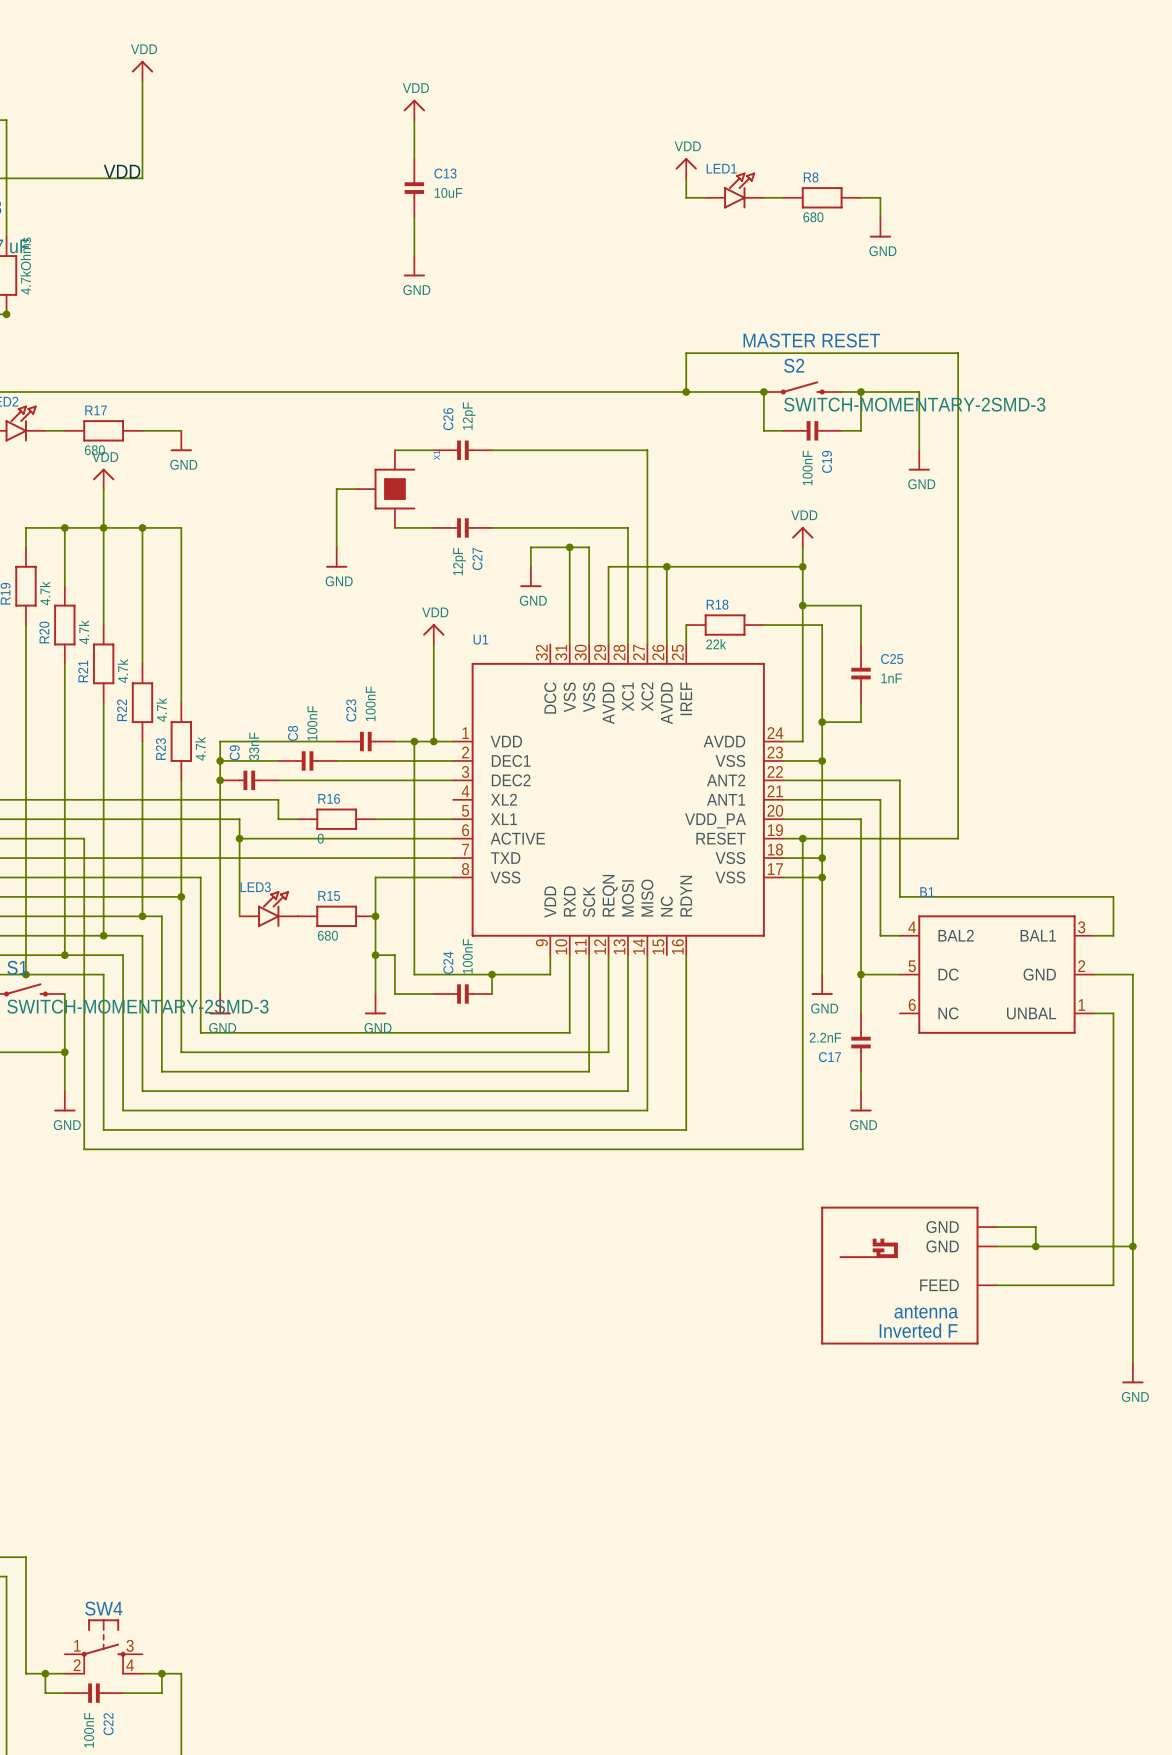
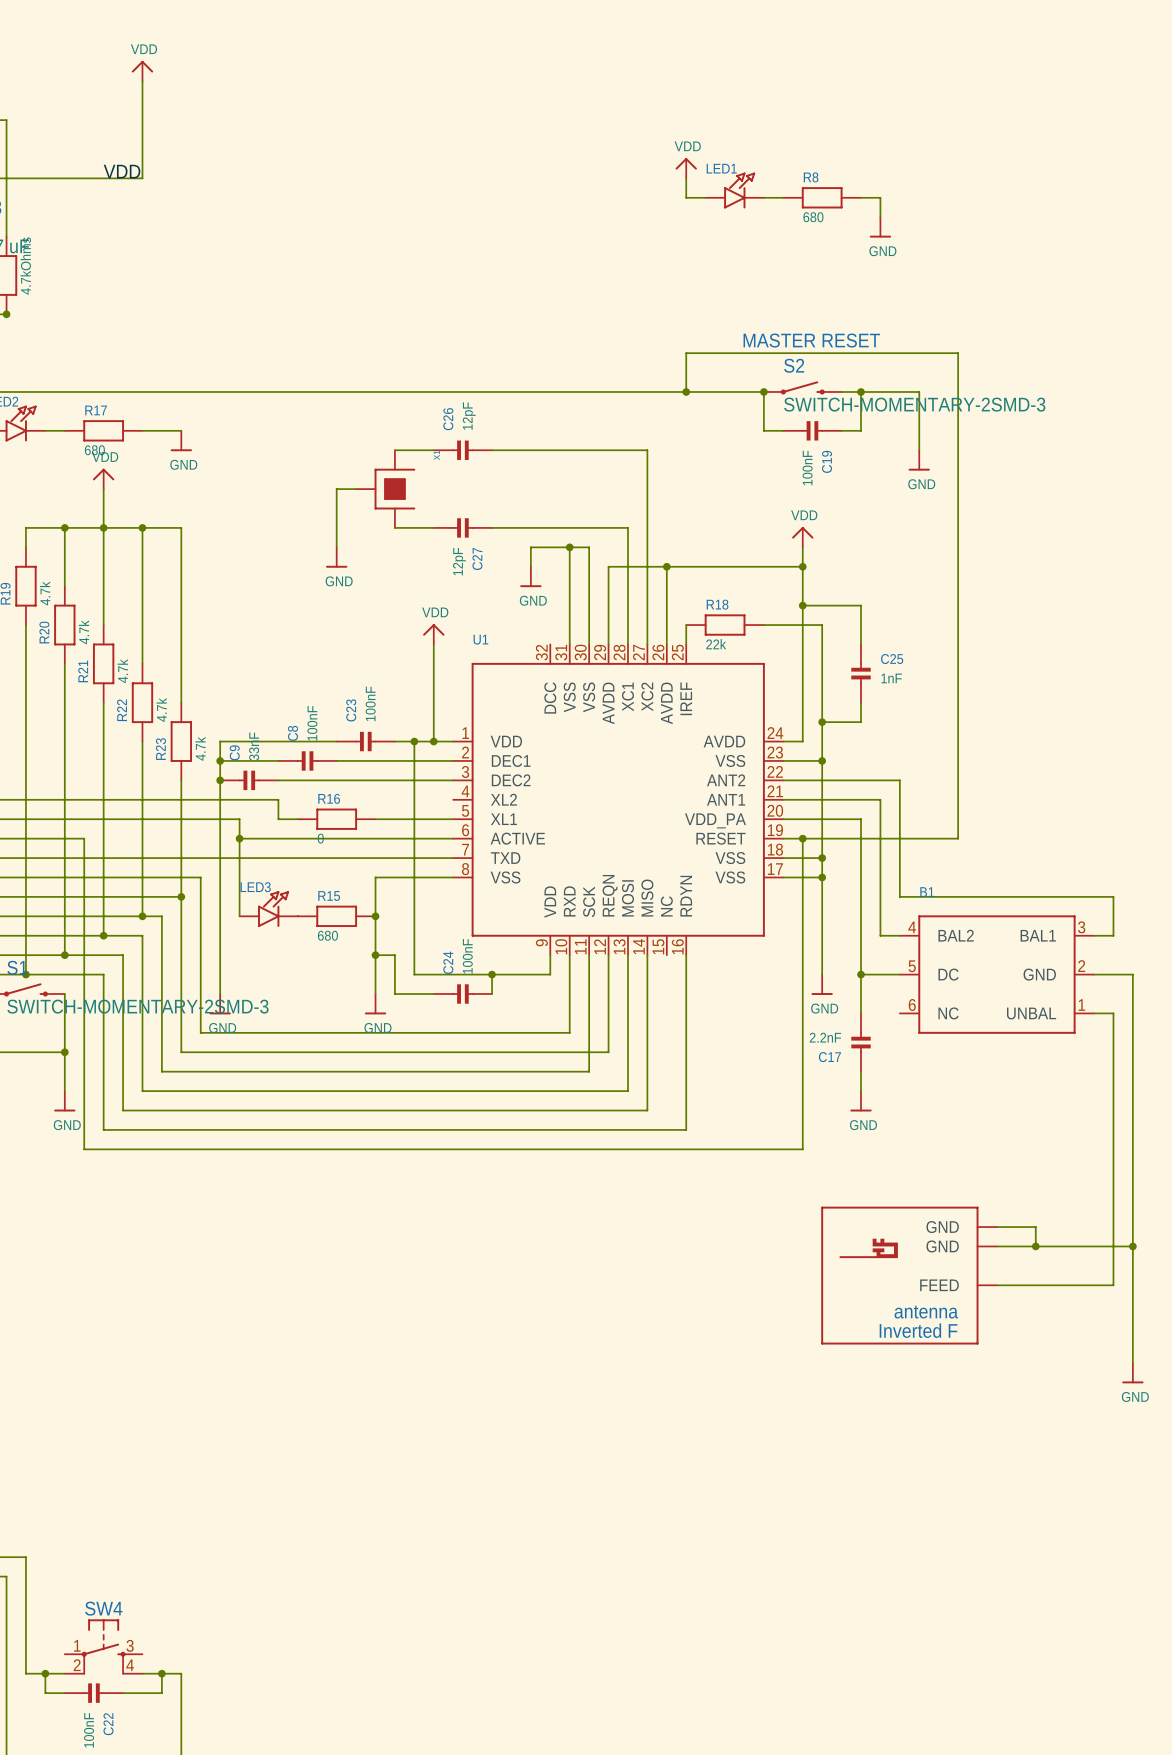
power symbol: VDD (414, 109) -> none
wire: (414, 120) (414, 158) -> none
C13: 10uF (414, 188) -> none
wire: (414, 217) (414, 256) -> none
power symbol: GND (414, 266) -> none

